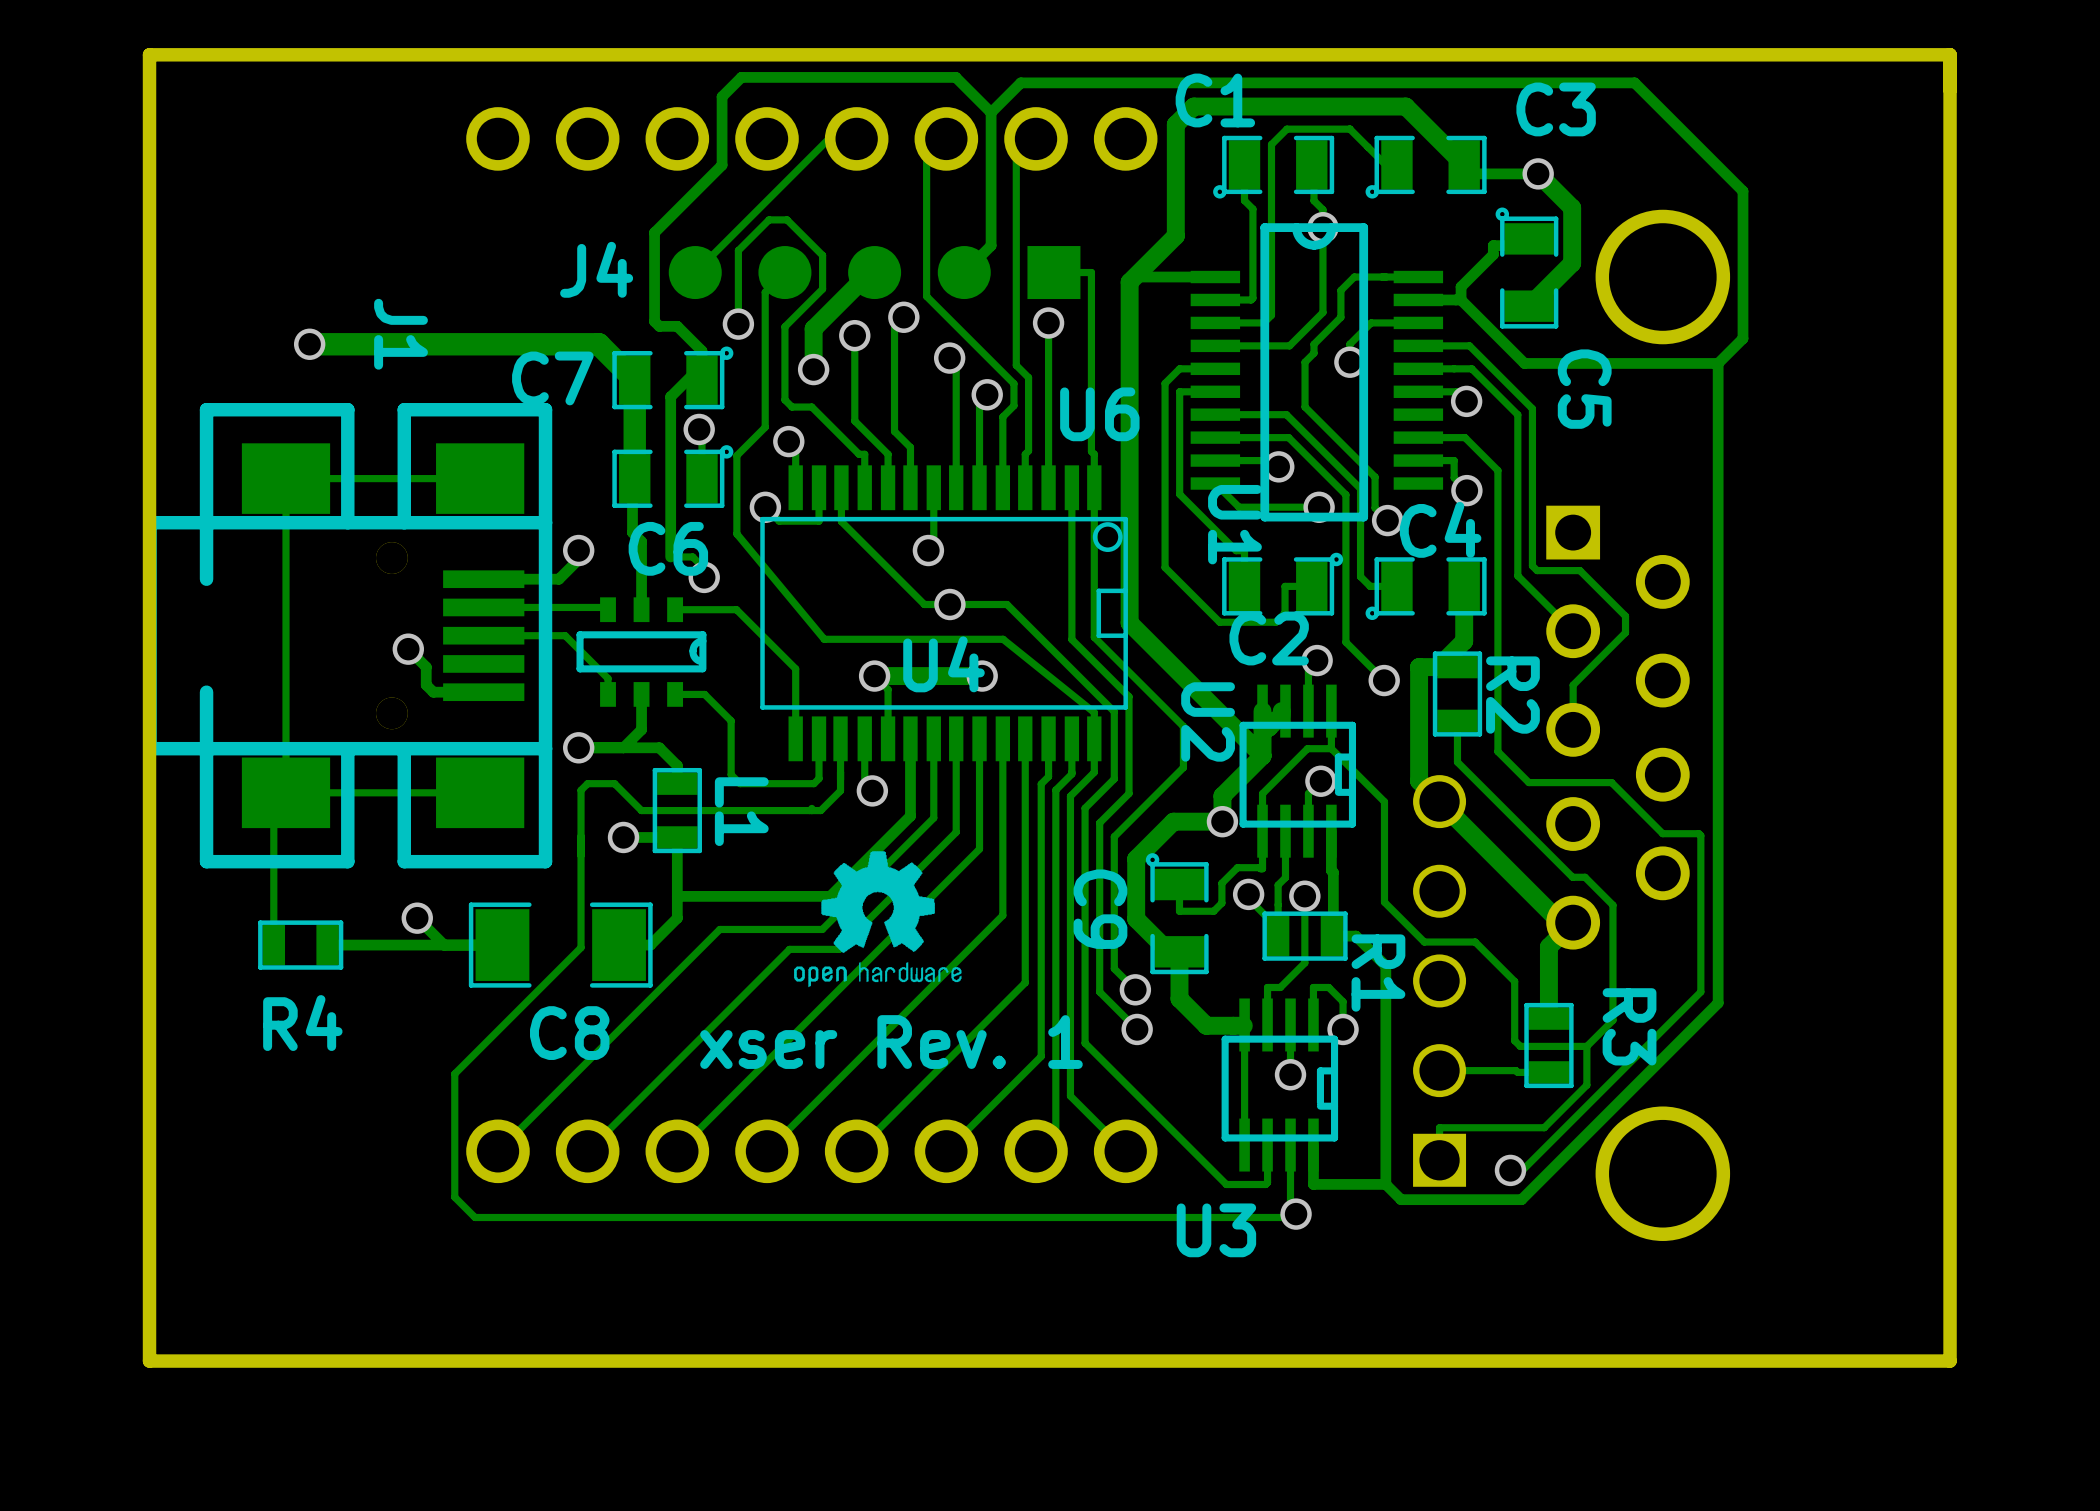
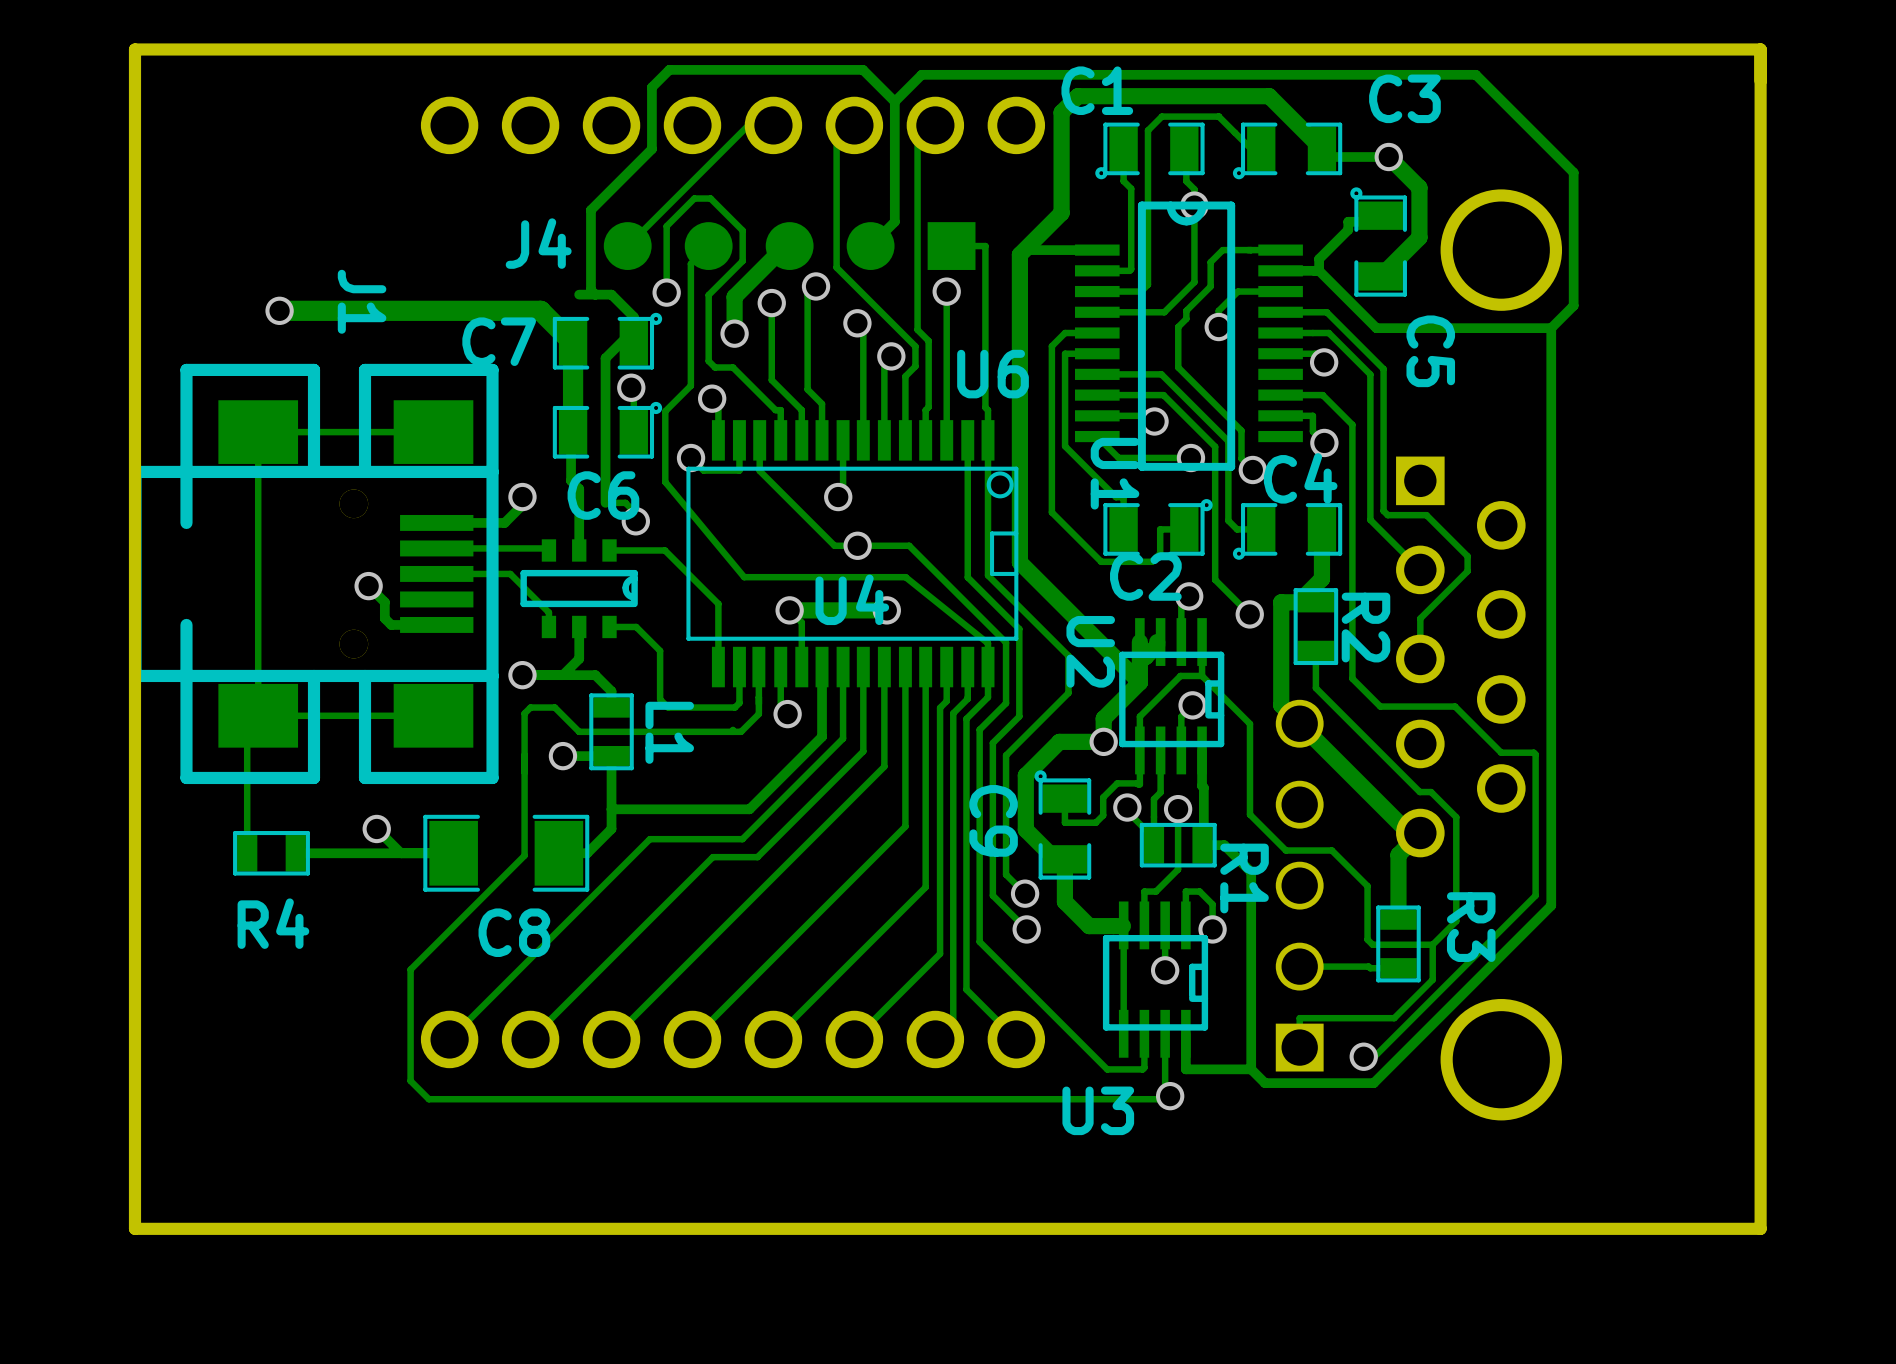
track: none -> (595, 294) (579, 294)
drawing: [794, 851, 962, 988] -> none
text: xser Rev. 1 (891, 1042) -> none

